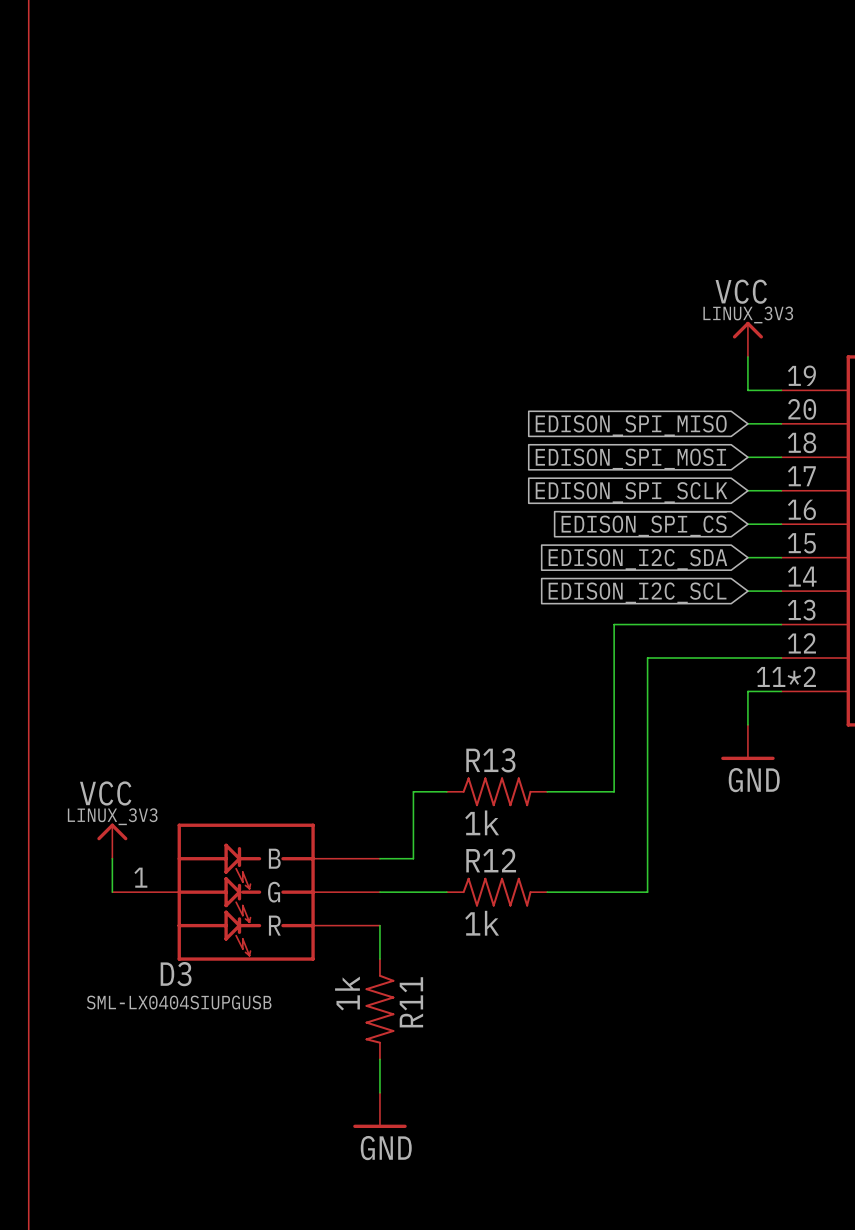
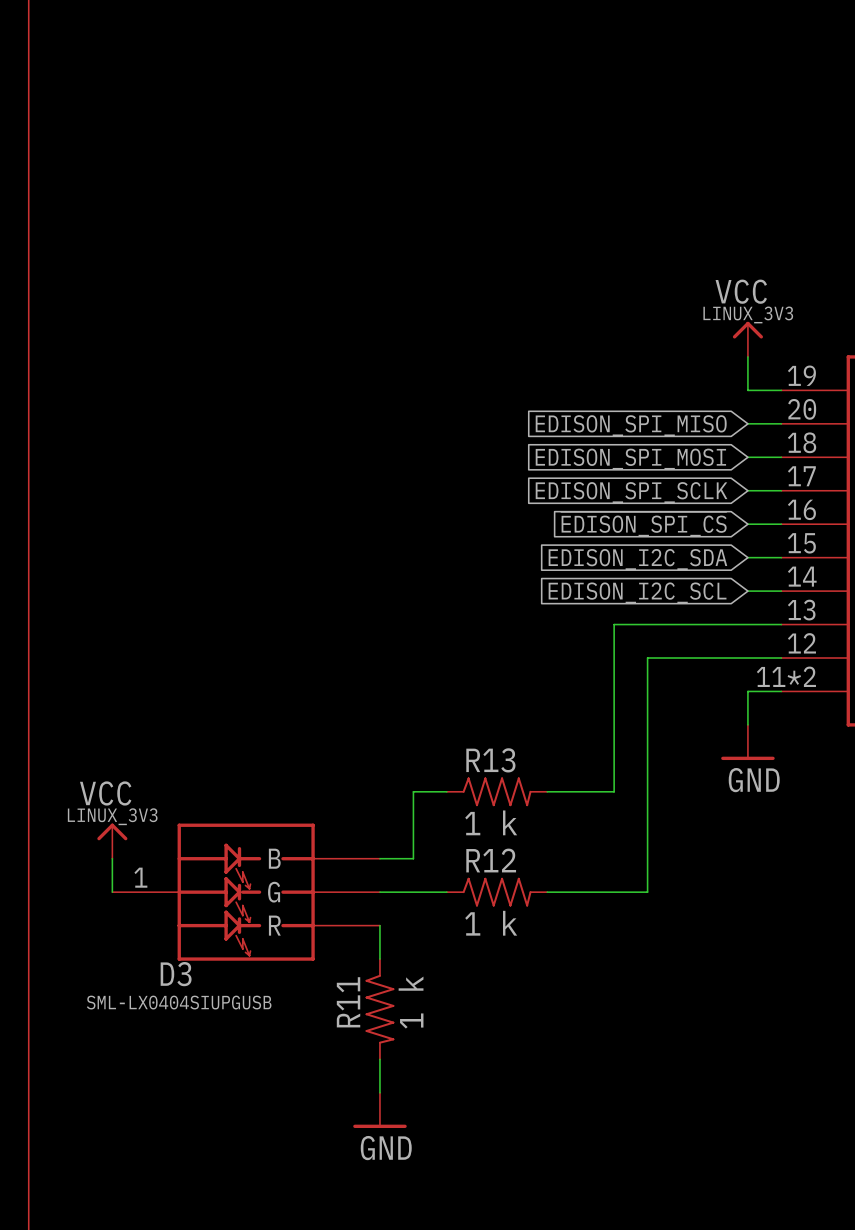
R13 value: 1k (482, 822) -> 1 k (491, 822)
R12 value: 1k (482, 923) -> 1 k (491, 923)
R11 value: 1k (347, 993) -> 1 k (411, 1002)
R11 flip: as is (379, 1009) -> left-right (379, 1009)

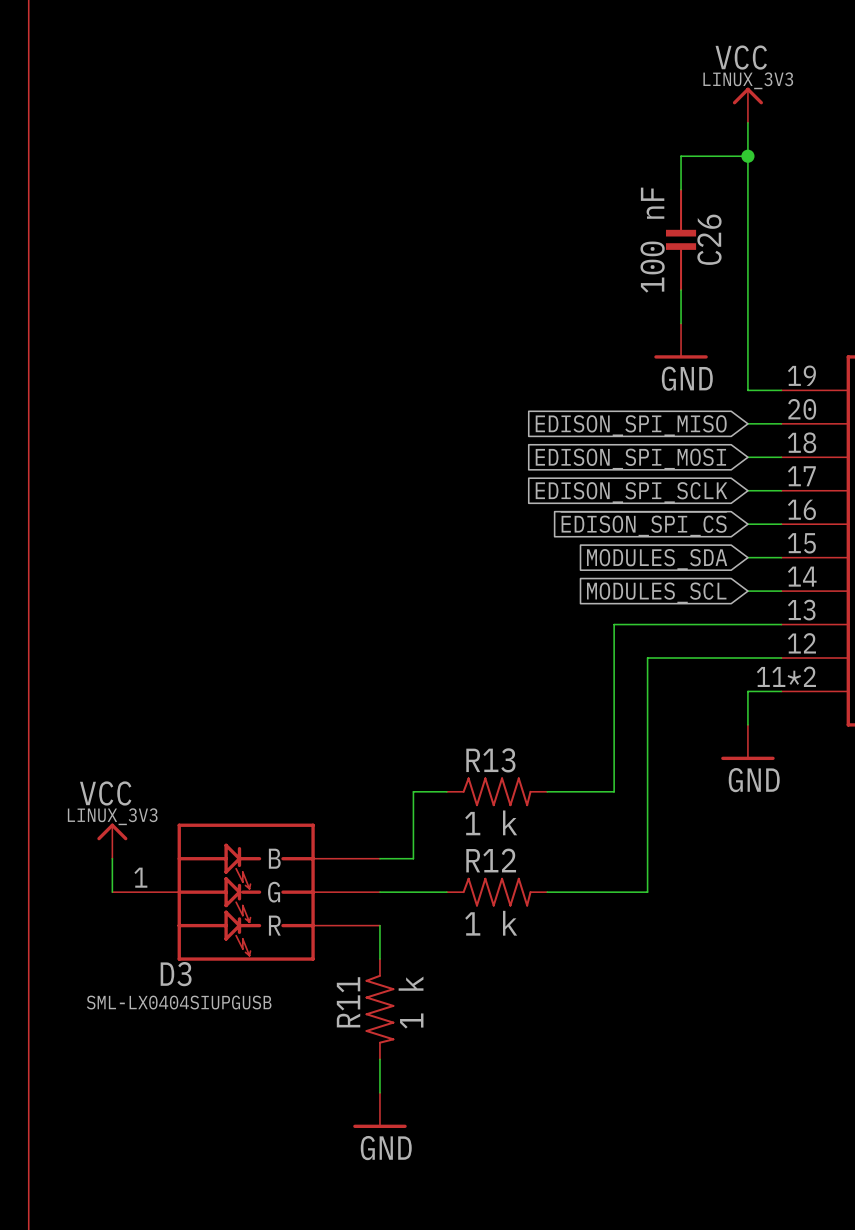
wire: none -> (747, 122) (747, 356)
wire: none -> (747, 156) (681, 156) (681, 189)
junction: none -> (747, 156)
C26: none -> 100 nF (681, 239)
wire: none -> (681, 290) (681, 323)
power symbol position: (747, 339) -> (747, 105)
power symbol: none -> GND (681, 341)
global label: EDISON_I2C_SDA (637, 559) -> MODULES_SDA (657, 559)
global label: EDISON_I2C_SCL (637, 592) -> MODULES_SCL (656, 592)

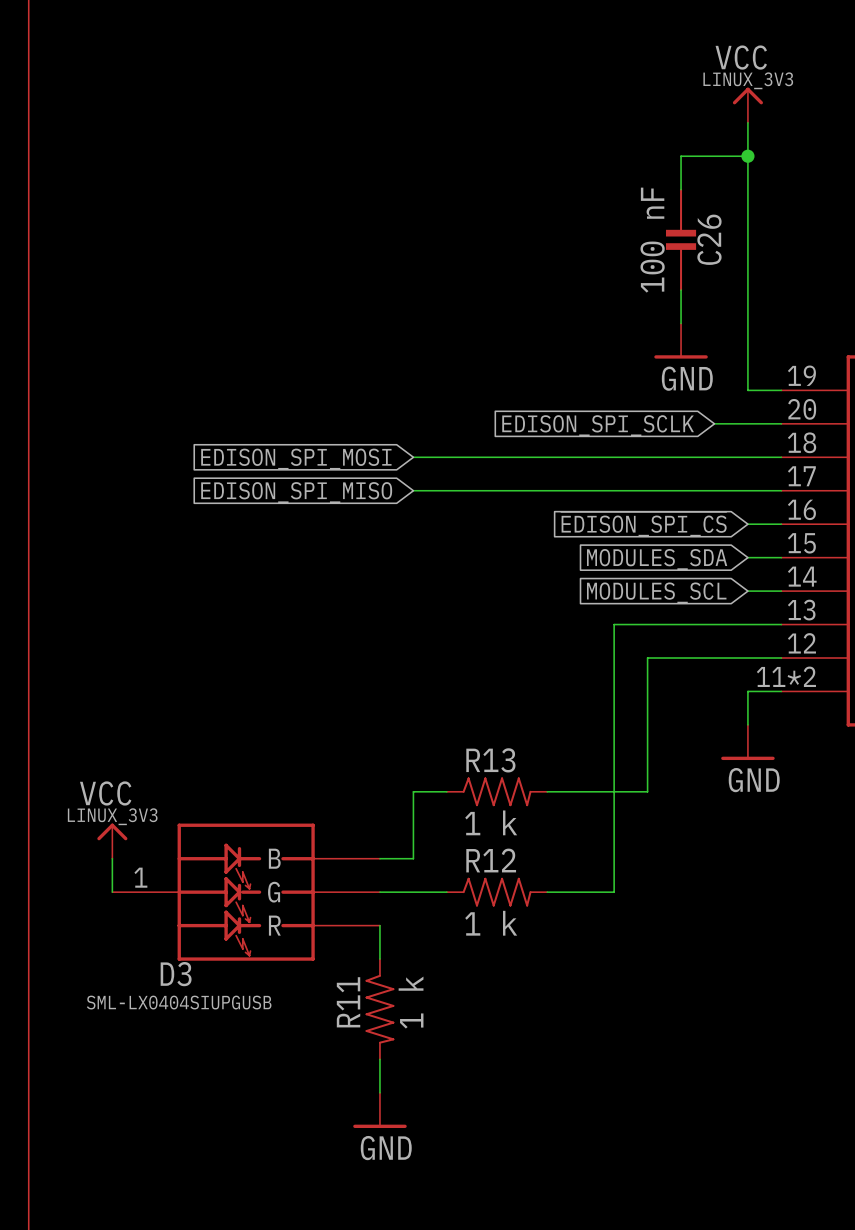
wire: none -> (714, 423) (747, 423)
global label: EDISON_SPI_MISO (631, 425) -> none
wire: none -> (413, 457) (747, 457)
global label: none -> EDISON_SPI_MOSI (296, 459)
global label: EDISON_SPI_MOSI (630, 459) -> none
wire: none -> (413, 490) (747, 490)
global label: none -> EDISON_SPI_MISO (296, 492)
global label position: EDISON_SPI_SCLK (631, 492) -> EDISON_SPI_SCLK (598, 425)
wire: (647, 791) (647, 892) (614, 892) -> (647, 791) (614, 791) (614, 892)

